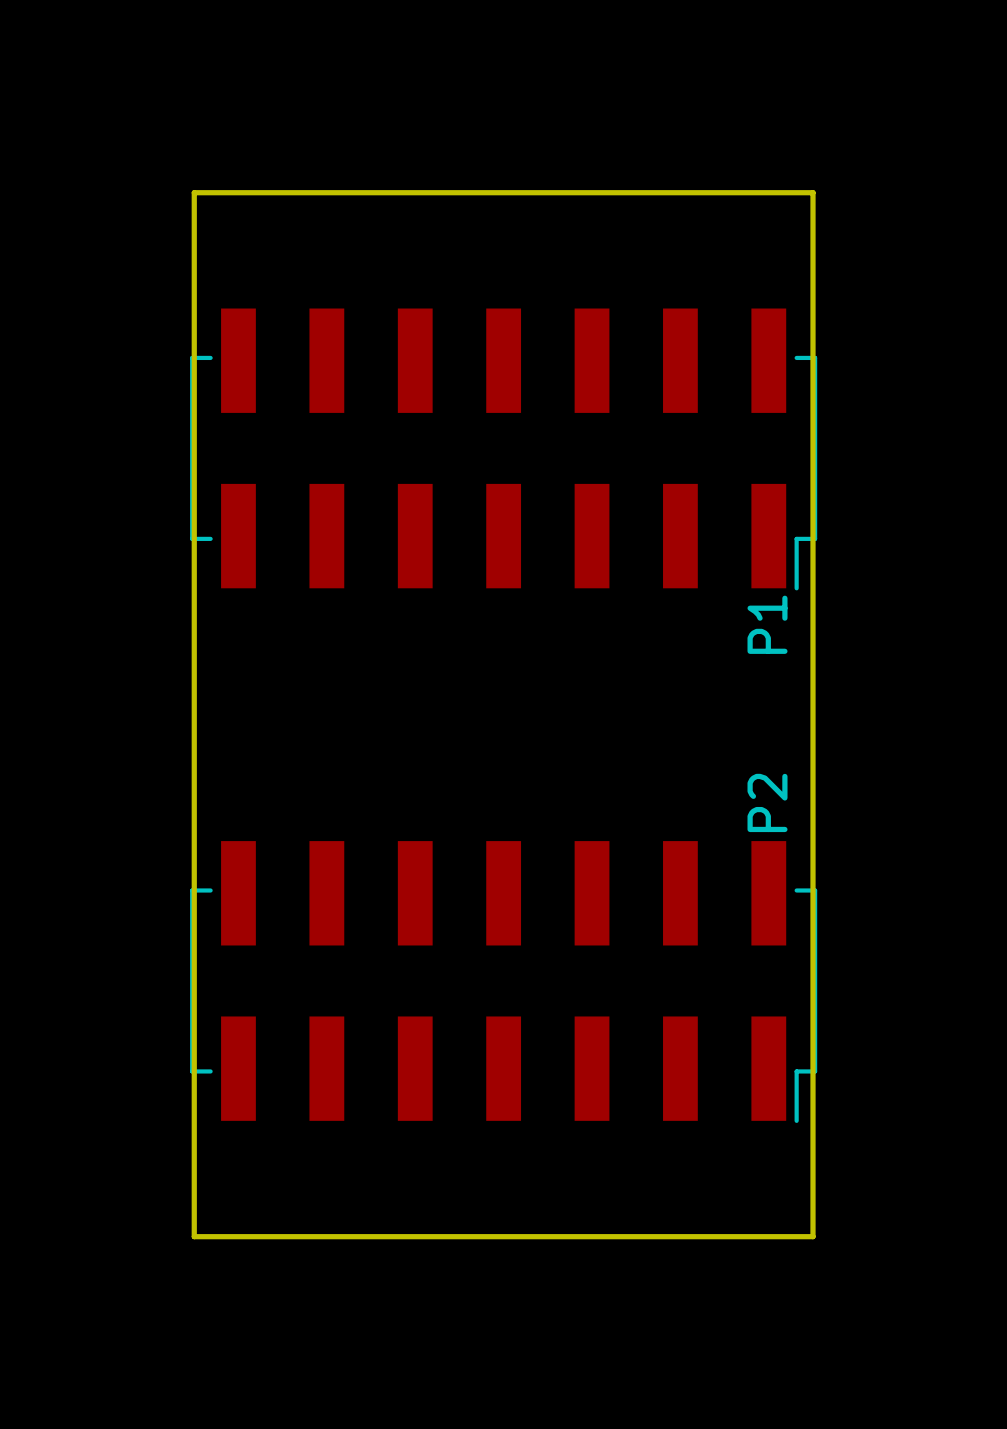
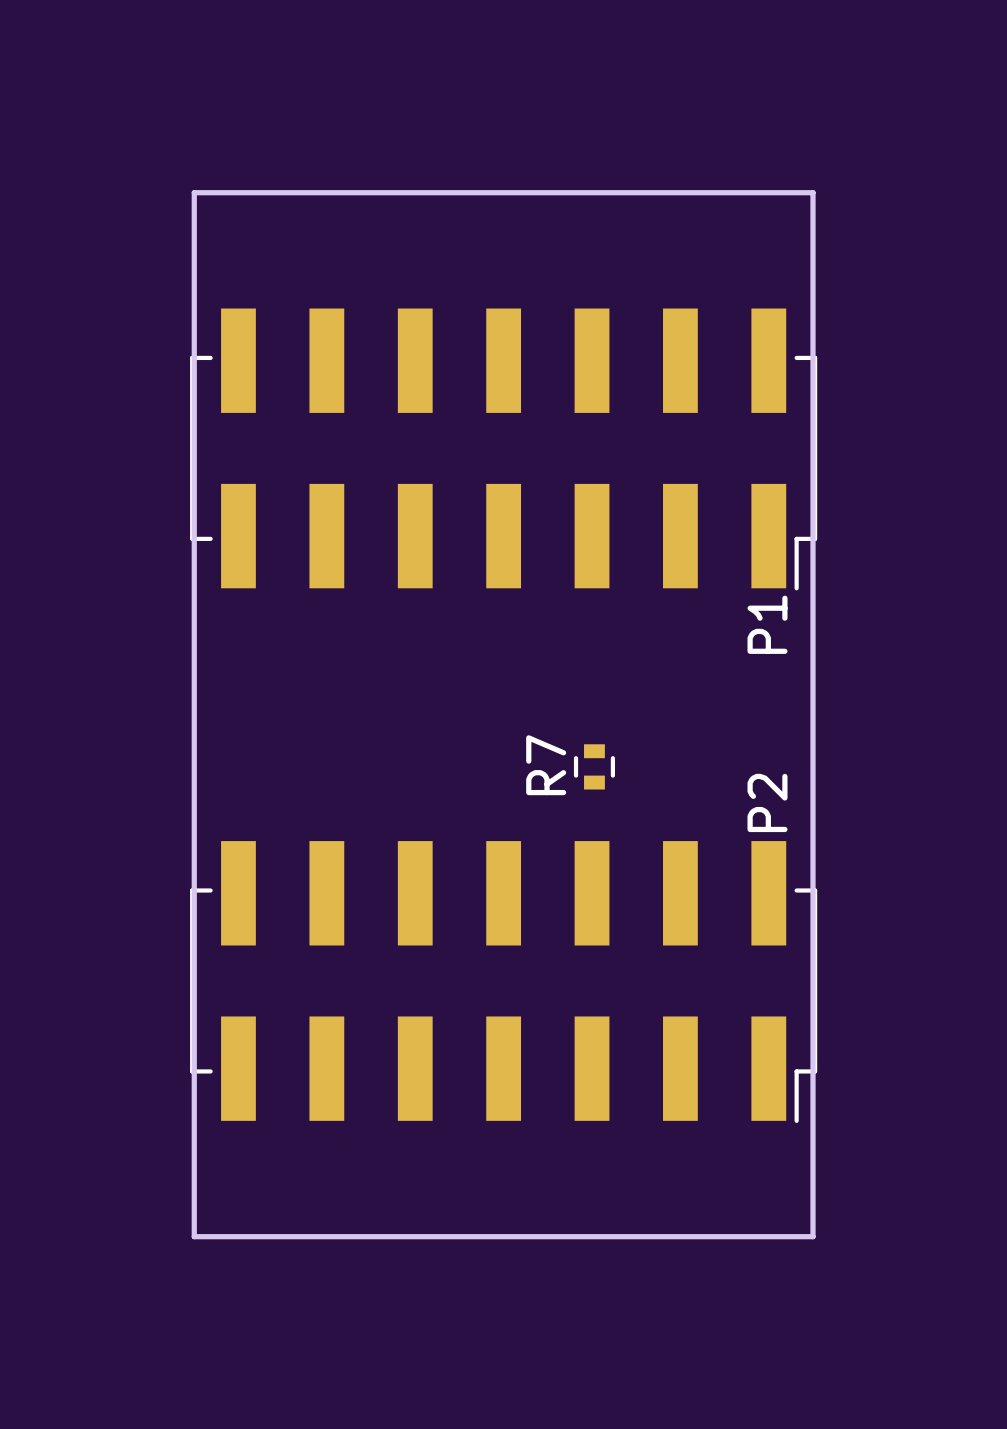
R7: none -> (594, 766)

